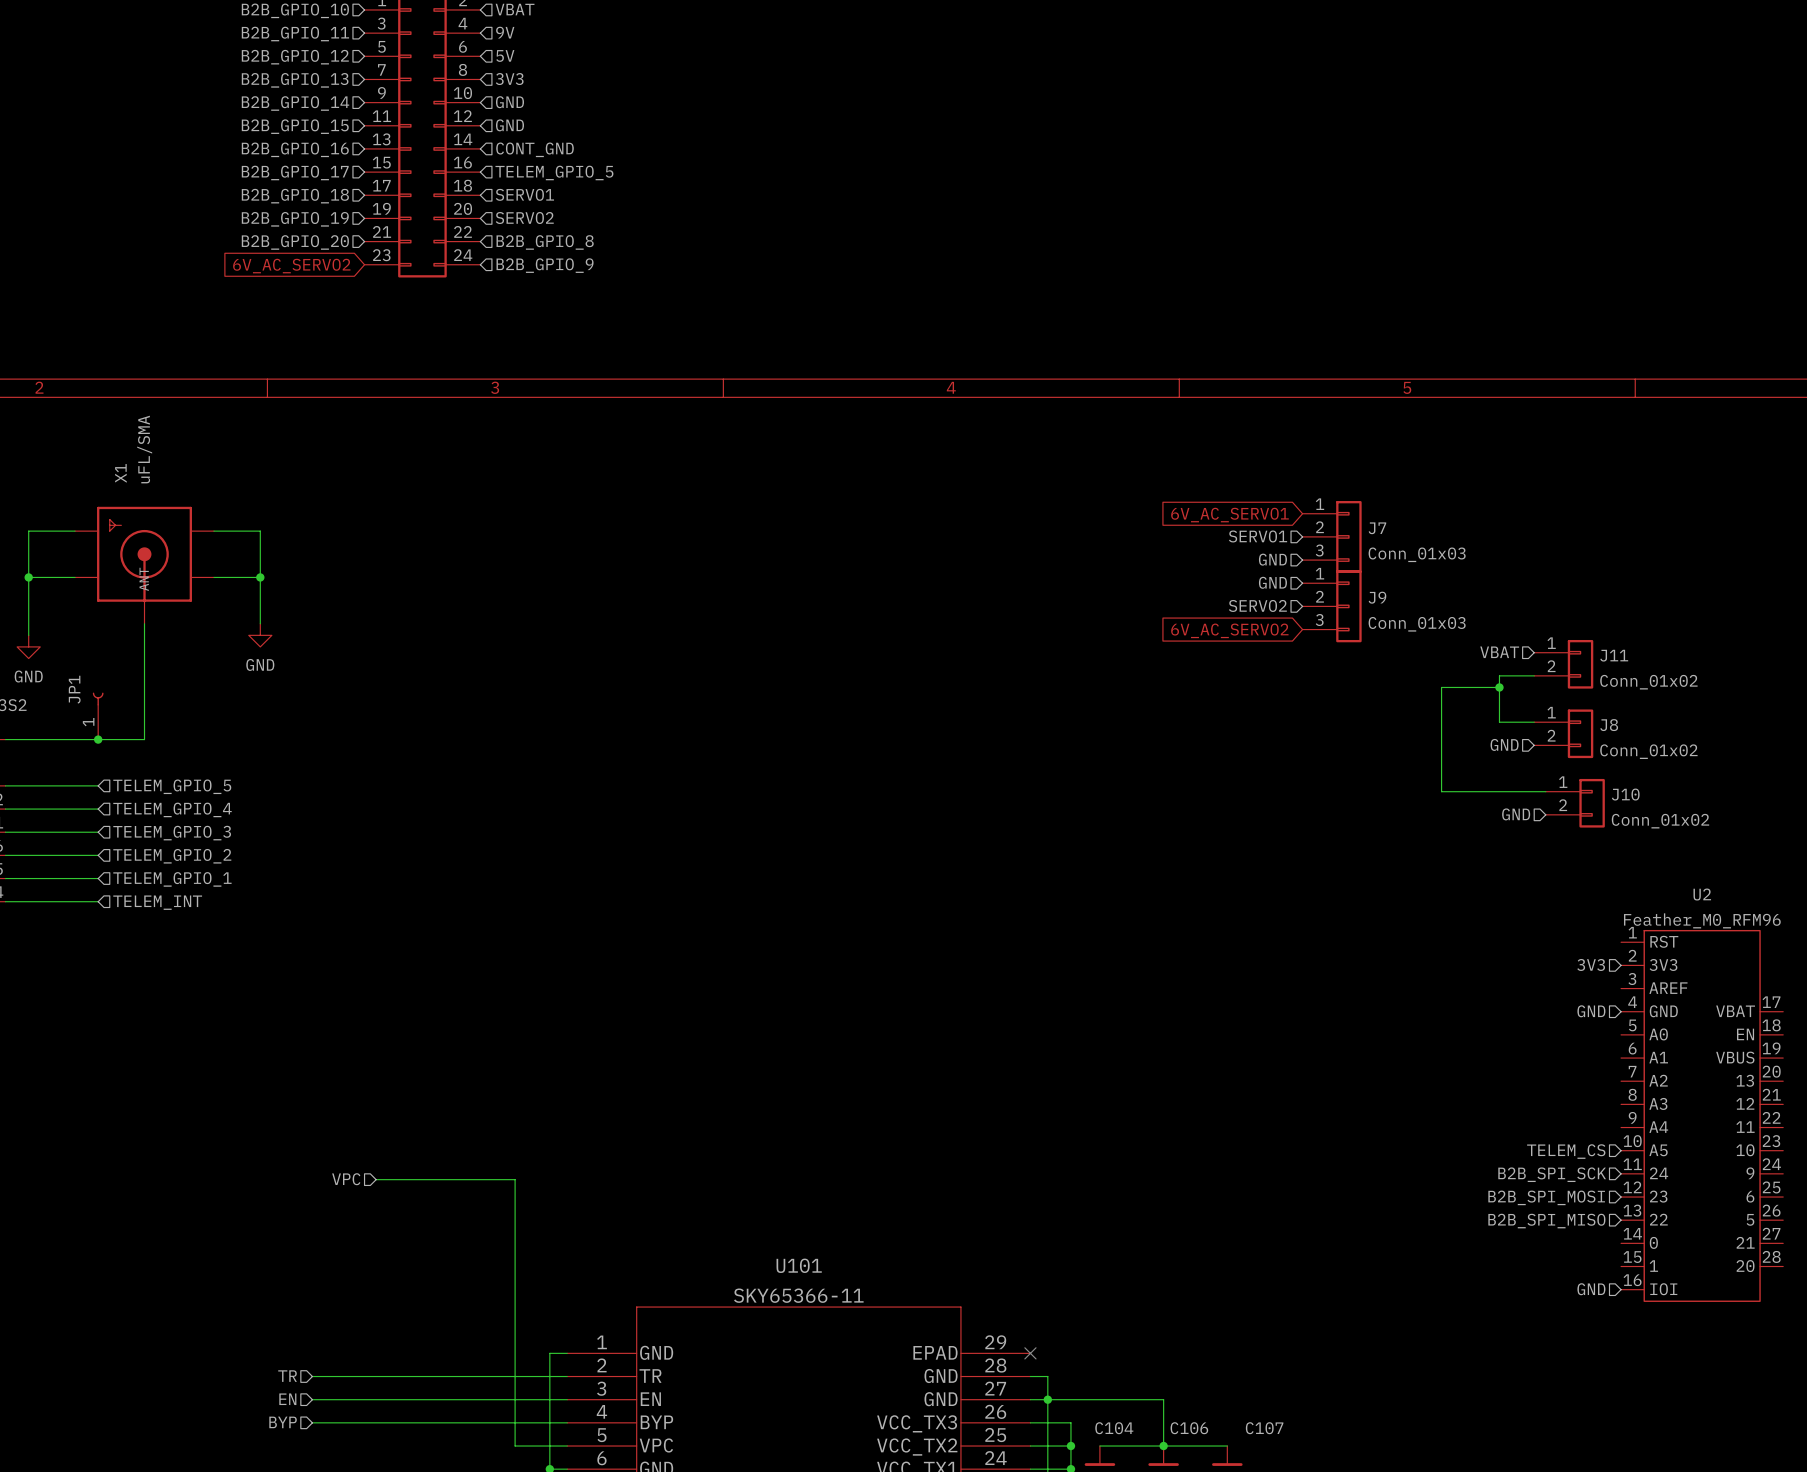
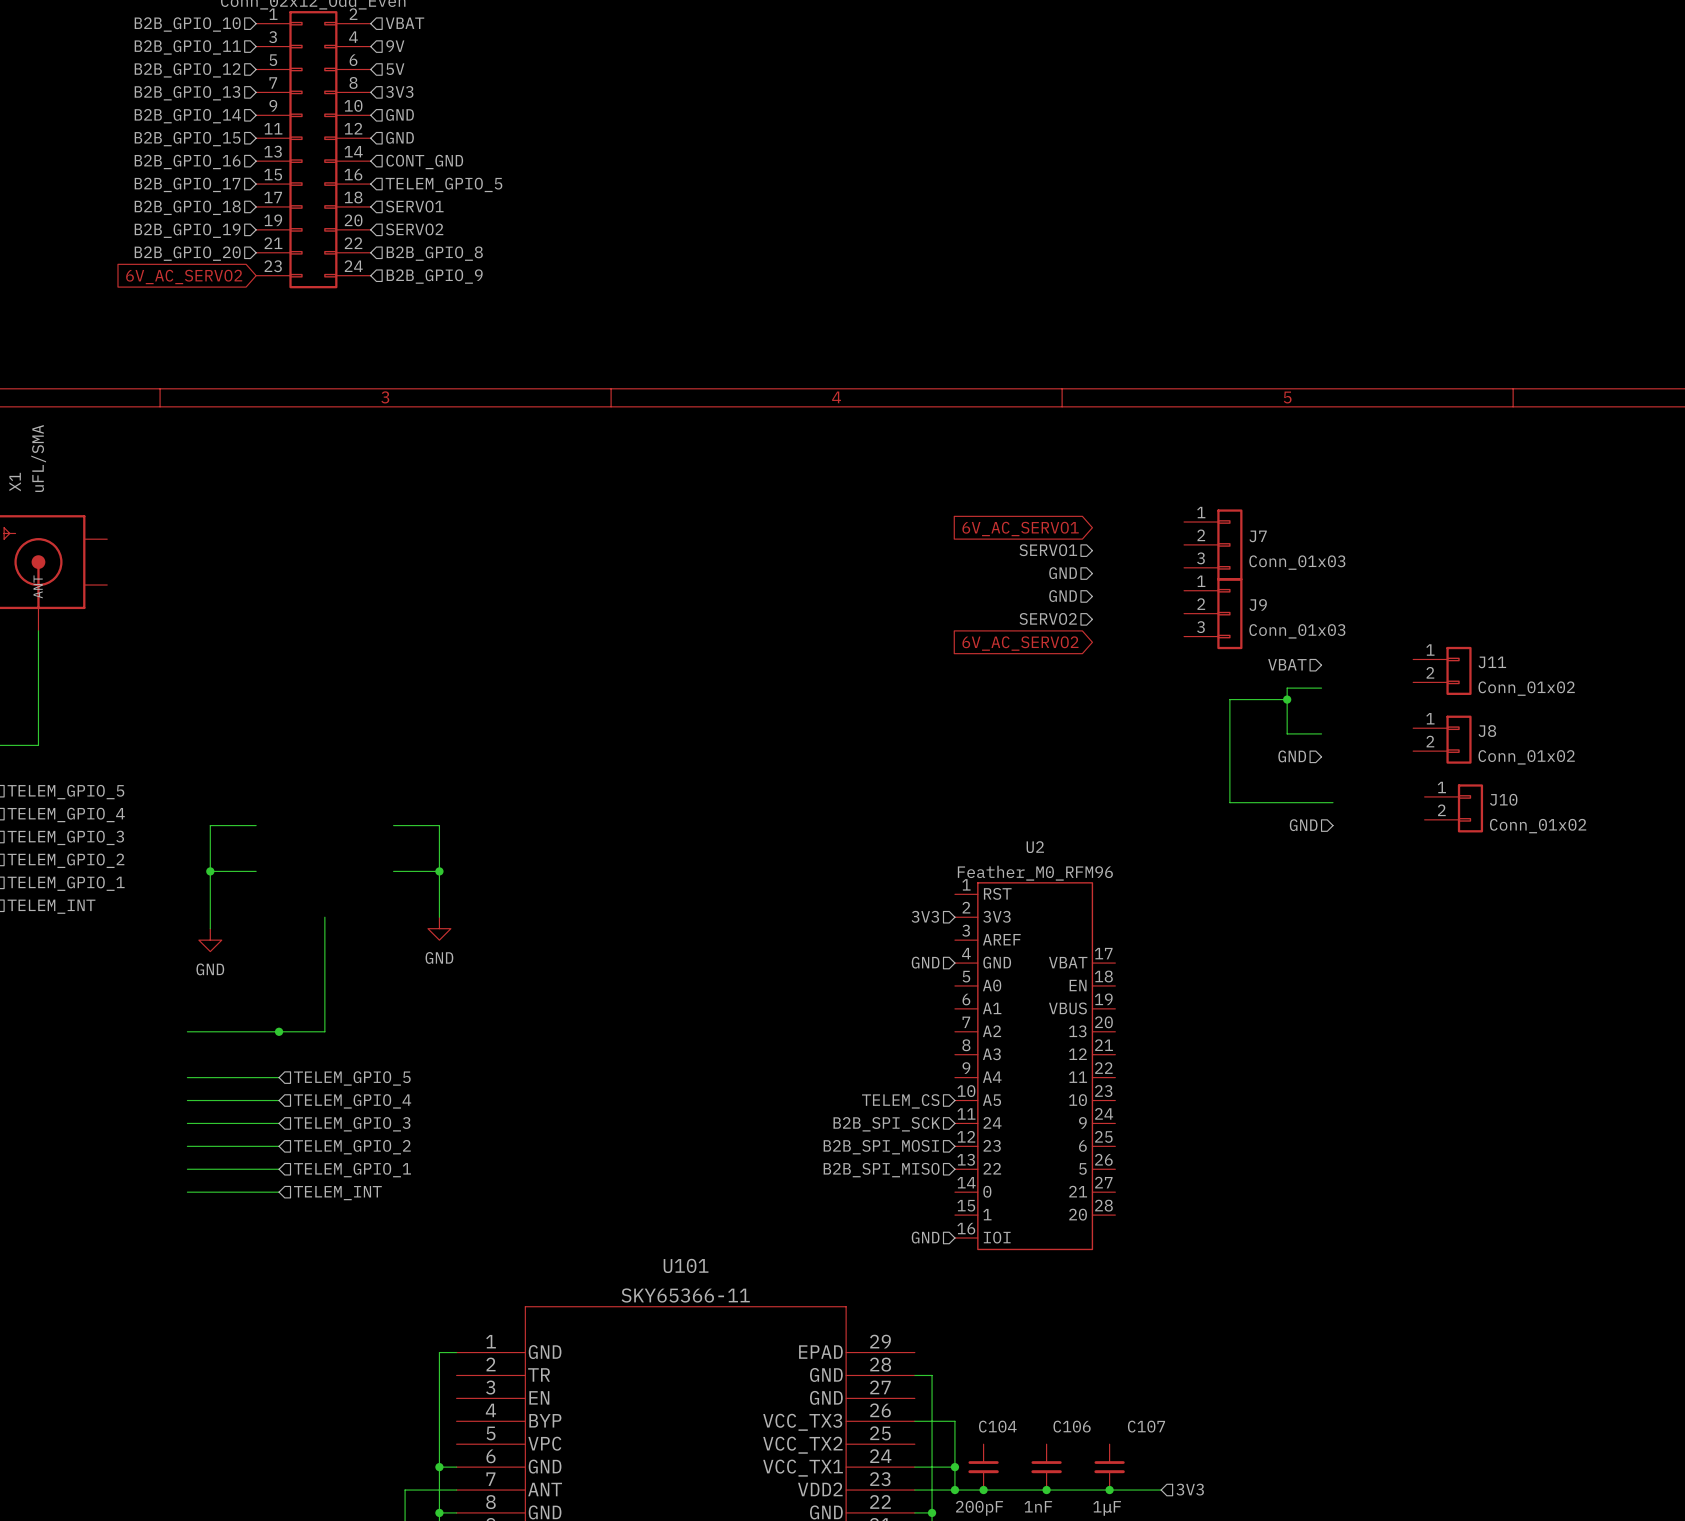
global label position: 6V_AC_SERVO1 (1229, 515) -> 6V_AC_SERVO1 (1020, 529)
wire: (213, 531) (260, 531) (260, 623) -> none
hierarchical label position: SERVO1 (1258, 536) -> SERVO1 (1048, 550)
hierarchical label: GND (1272, 559) -> none
hierarchical label: none -> GND (1063, 573)
wire: (213, 577) (260, 577) -> none
junction: (260, 577) -> none
hierarchical label: GND (1272, 582) -> none
hierarchical label: none -> GND (1063, 596)
hierarchical label position: SERVO2 (1257, 605) -> SERVO2 (1048, 618)
global label position: 6V_AC_SERVO2 (1229, 630) -> 6V_AC_SERVO2 (1020, 643)
power symbol: GND (260, 635) -> none
hierarchical label position: VBAT (1499, 652) -> VBAT (1287, 664)
wire: (1534, 675) (1499, 675) (1499, 722) (1534, 722) -> (1321, 688) (1287, 688) (1287, 733) (1321, 733)
wire: (1499, 687) (1441, 687) (1441, 791) (1545, 791) -> (1287, 699) (1229, 699) (1229, 802) (1332, 802)
junction: (1499, 687) -> none
junction: none -> (1287, 699)
hierarchical label: GND (1504, 744) -> none
hierarchical label: none -> GND (1292, 756)
hierarchical label: GND (1516, 814) -> none
wire: none -> (256, 825) (210, 825) (210, 928)
wire: none -> (393, 825) (439, 825) (439, 917)
hierarchical label: none -> GND (1303, 825)
wire: none -> (210, 871) (256, 871)
junction: none -> (210, 871)
wire: none -> (393, 871) (439, 871)
junction: none -> (439, 871)
hierarchical label: none -> 3V3 (925, 916)
wire: none -> (324, 917) (324, 1031) (187, 1031)
power symbol: none -> GND (439, 928)
power symbol: none -> GND (210, 940)
hierarchical label: none -> GND (925, 962)
hierarchical label: 3V3 (1591, 964) -> none
hierarchical label: GND (1591, 1011) -> none
junction: none -> (279, 1031)
wire: none -> (187, 1077) (279, 1077)
hierarchical label: none -> TELEM_GPIO_5 (352, 1078)
wire: none -> (187, 1100) (279, 1100)
hierarchical label: none -> TELEM_GPIO_4 (352, 1101)
hierarchical label: none -> TELEM_CS (900, 1101)
U2 position: (1702, 1115) -> (1035, 1066)
wire: none -> (187, 1123) (279, 1123)
hierarchical label: none -> TELEM_GPIO_3 (352, 1124)
hierarchical label: none -> B2B_SPI_SCK (886, 1124)
wire: none -> (187, 1146) (279, 1146)
hierarchical label: none -> TELEM_GPIO_2 (352, 1147)
hierarchical label: none -> B2B_SPI_MOSI (881, 1147)
hierarchical label: TELEM_CS (1566, 1151) -> none
wire: none -> (187, 1169) (279, 1169)
hierarchical label: none -> TELEM_GPIO_1 (352, 1170)
hierarchical label: none -> B2B_SPI_MISO (881, 1170)
hierarchical label: B2B_SPI_SCK (1552, 1174) -> none
hierarchical label: VPC (346, 1179) -> none
wire: (376, 1179) (515, 1179) (515, 1446) (567, 1446) -> none
wire: none -> (187, 1192) (279, 1192)
hierarchical label: none -> TELEM_INT (337, 1193)
hierarchical label: B2B_SPI_MOSI (1546, 1197) -> none
hierarchical label: B2B_SPI_MISO (1546, 1221) -> none
hierarchical label: none -> GND (925, 1237)
hierarchical label: GND (1591, 1289) -> none
no-connect mark: (1030, 1353) -> none
hierarchical label: TR (287, 1376) -> none
wire: (312, 1376) (567, 1376) -> none
hierarchical label: EN (287, 1399) -> none
wire: (312, 1399) (567, 1399) -> none
wire: (1030, 1399) (1163, 1399) (1163, 1446) -> none
junction: (1047, 1399) -> none
hierarchical label: BYP (283, 1422) -> none
wire: (312, 1422) (567, 1422) -> none
wire: (1030, 1446) (1070, 1446) -> none
junction: (1070, 1446) -> none
wire: (1099, 1446) (1227, 1446) -> none
junction: (1163, 1446) -> none

